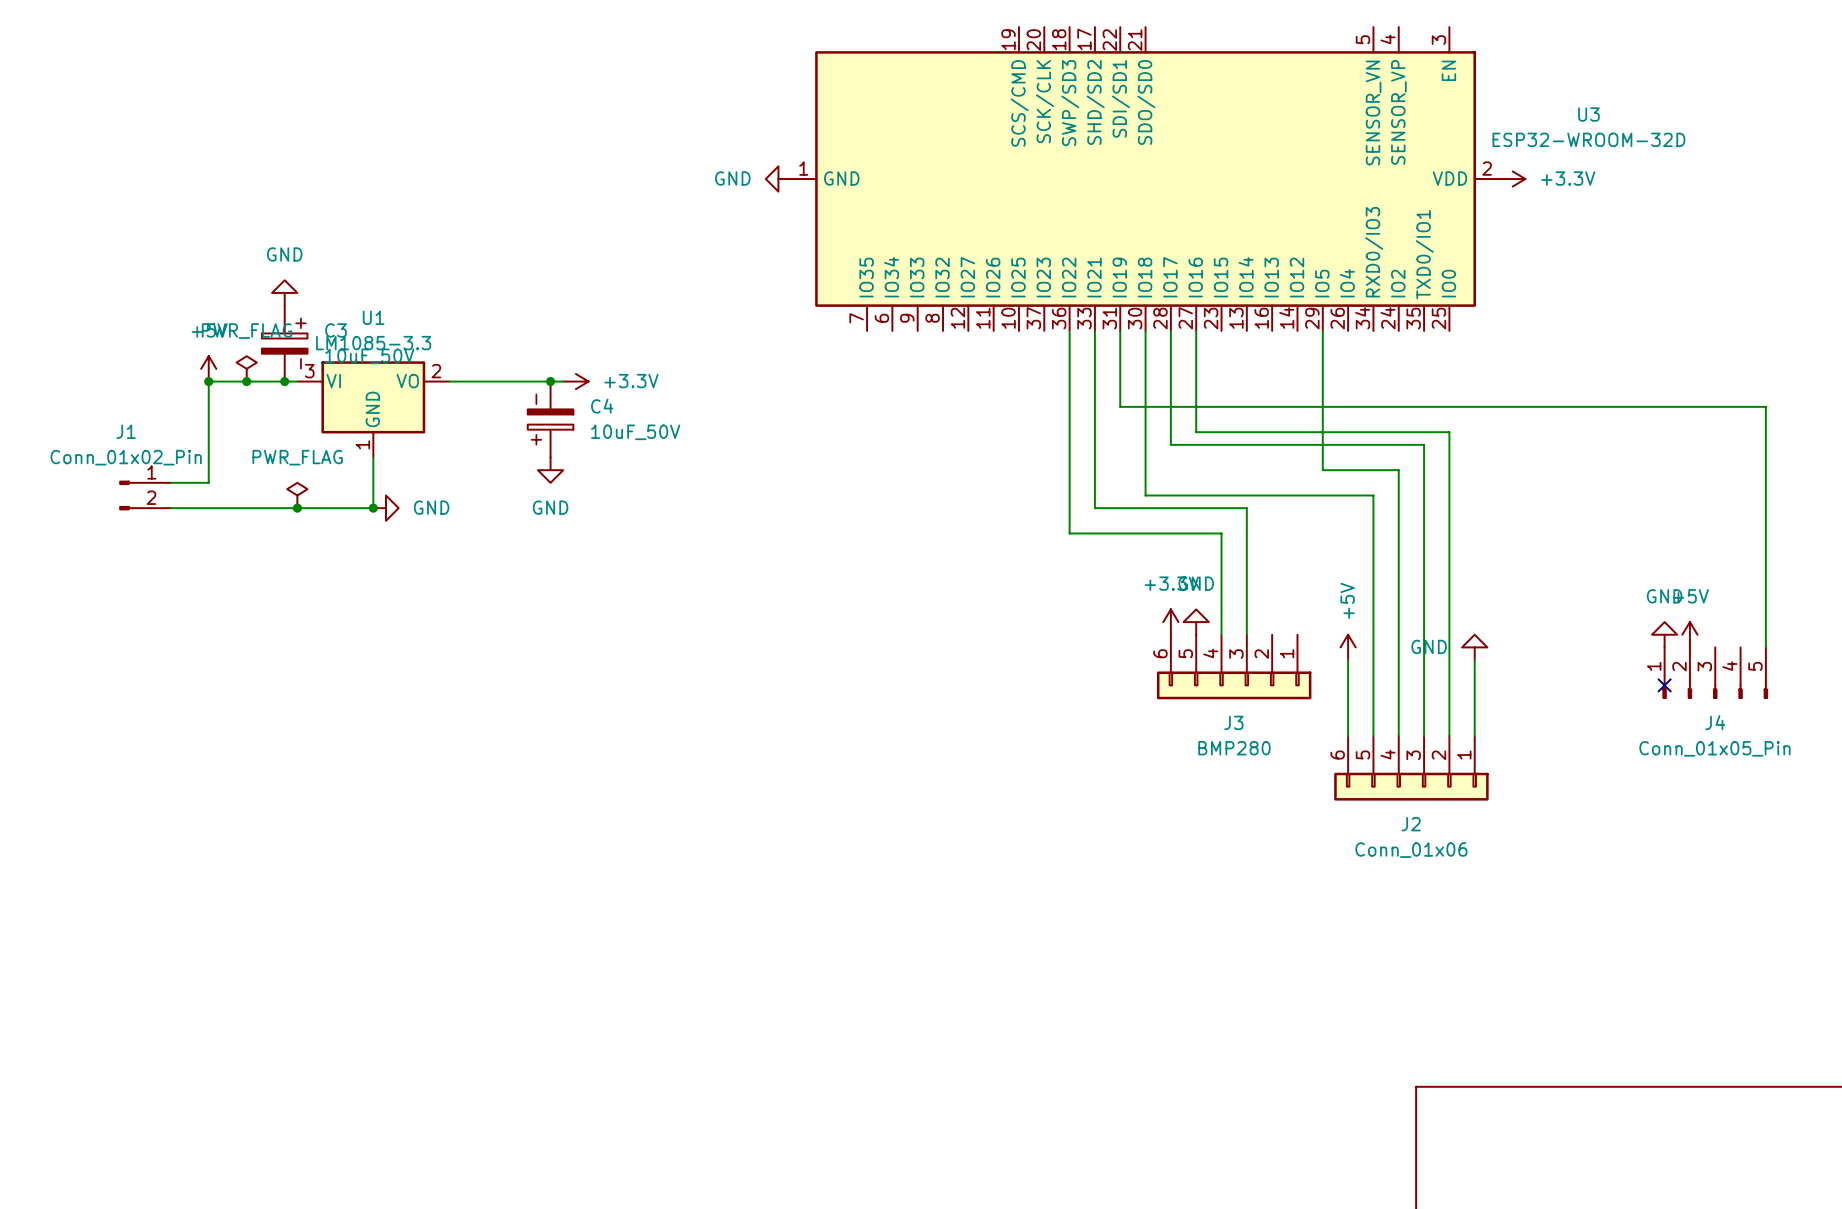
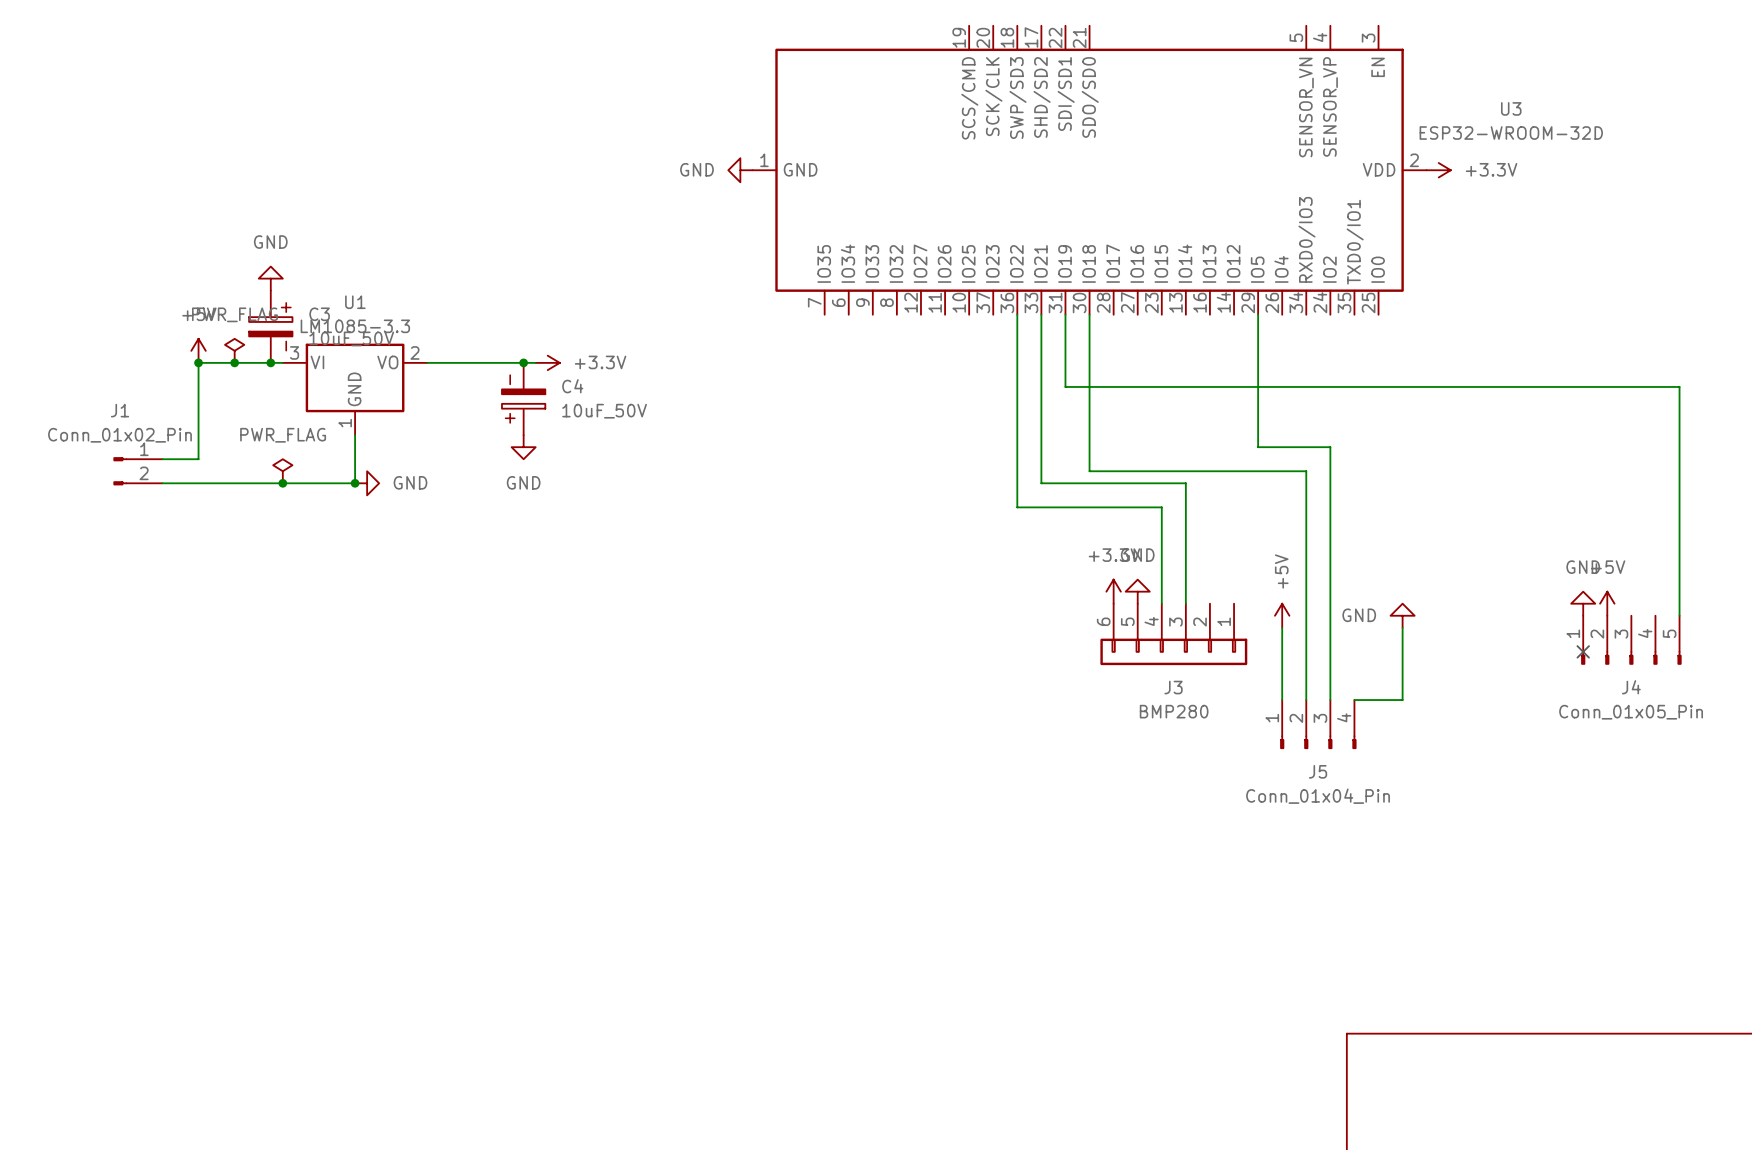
wire: (1170, 330) (1170, 444) (1424, 444) (1424, 736) -> (1402, 700) (1354, 700)
wire: (1196, 330) (1196, 432) (1449, 432) (1449, 736) -> none
J5: none -> Conn_01x04_Pin (1318, 724)
J2: Conn_01x06 (1411, 768) -> none

